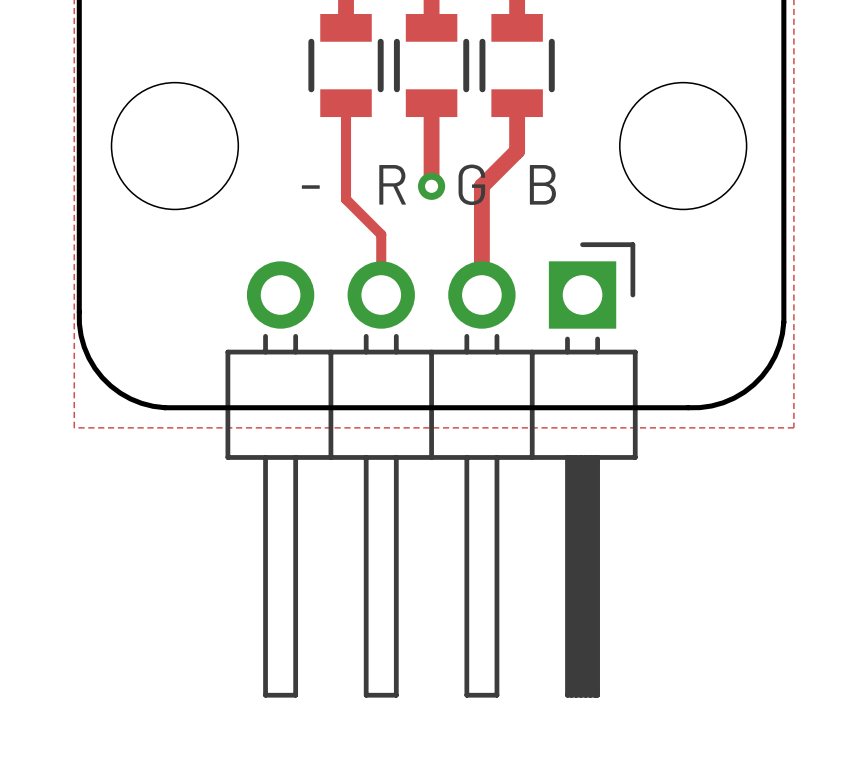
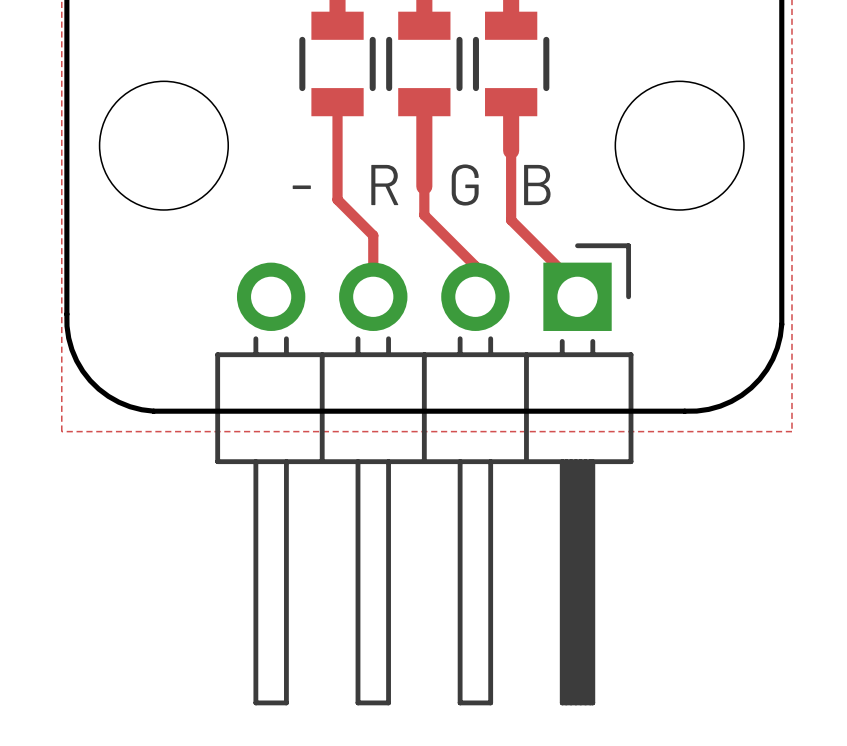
track: (517, 151) (481, 186) (481, 295) -> (511, 150) (511, 220) (577, 286)
track: none -> (424, 186) (424, 215) (475, 266)
via: (431, 186) -> none

